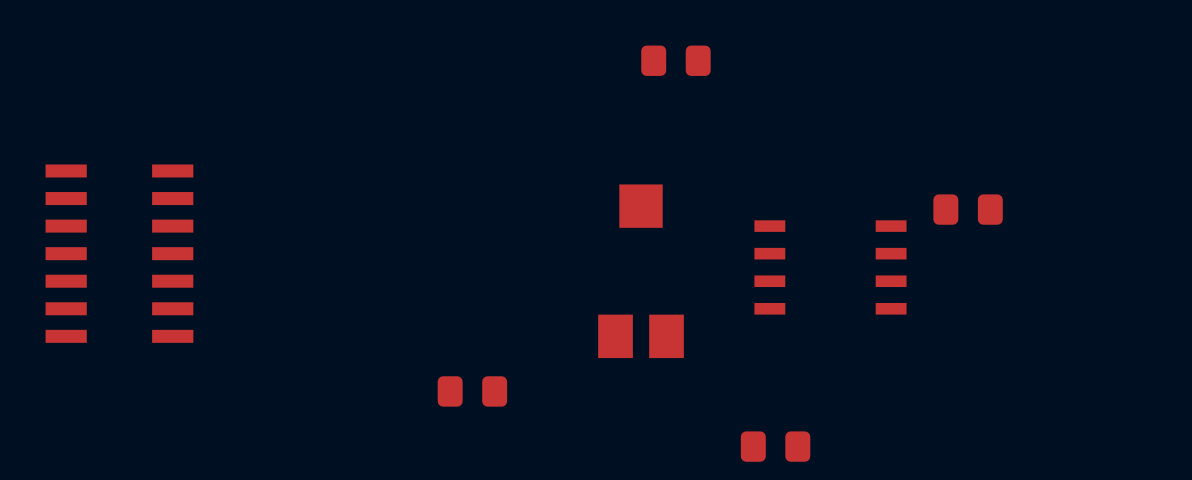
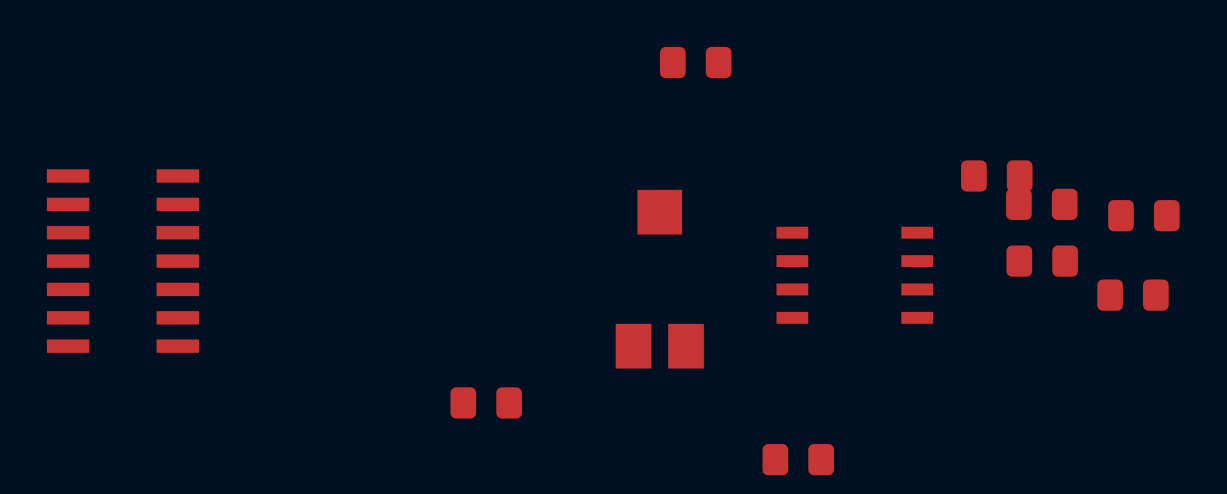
part: none -> (996, 175)
part: none -> (1041, 204)
part: (968, 209) -> none
part: none -> (1143, 215)
part: none -> (1042, 261)
part: none -> (1132, 295)

